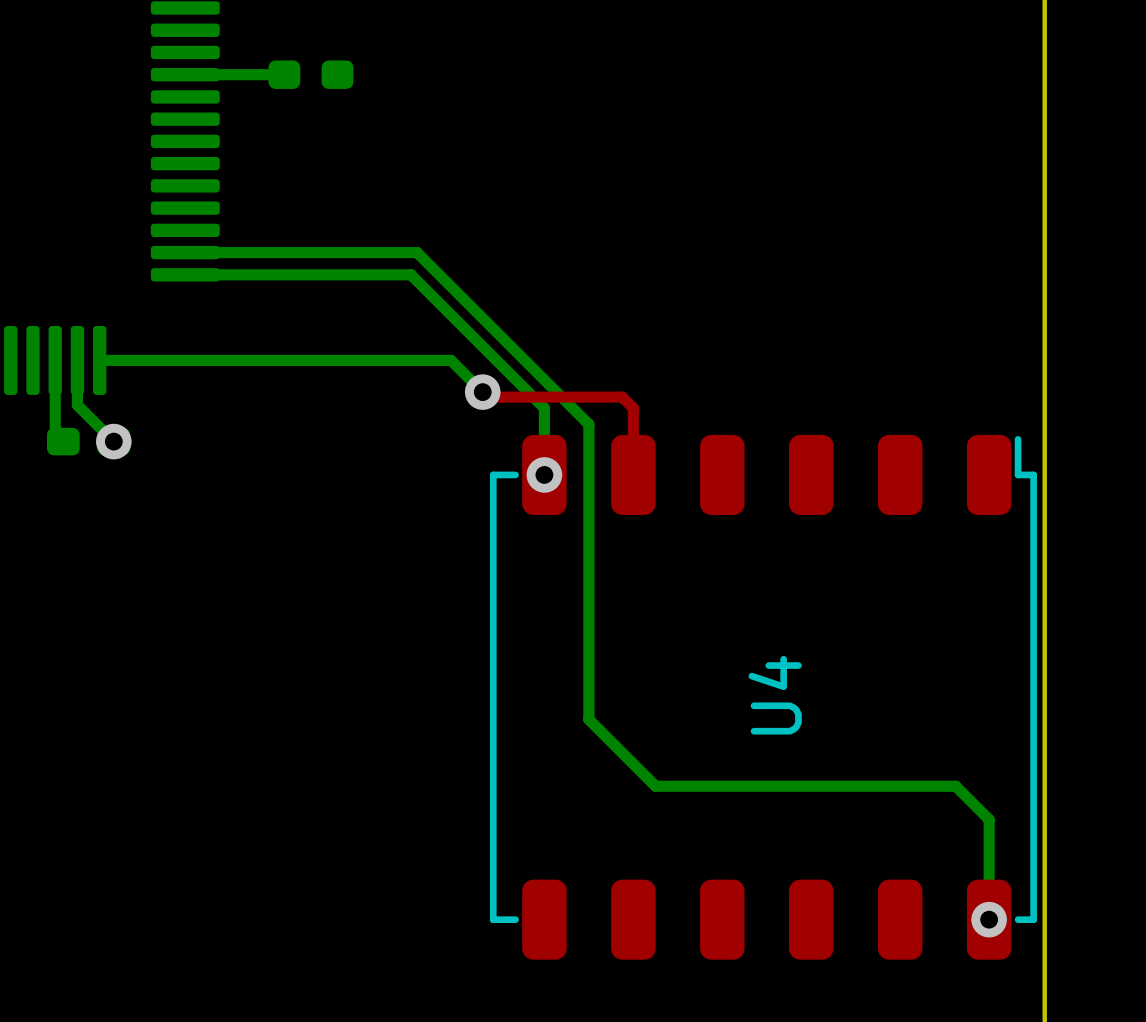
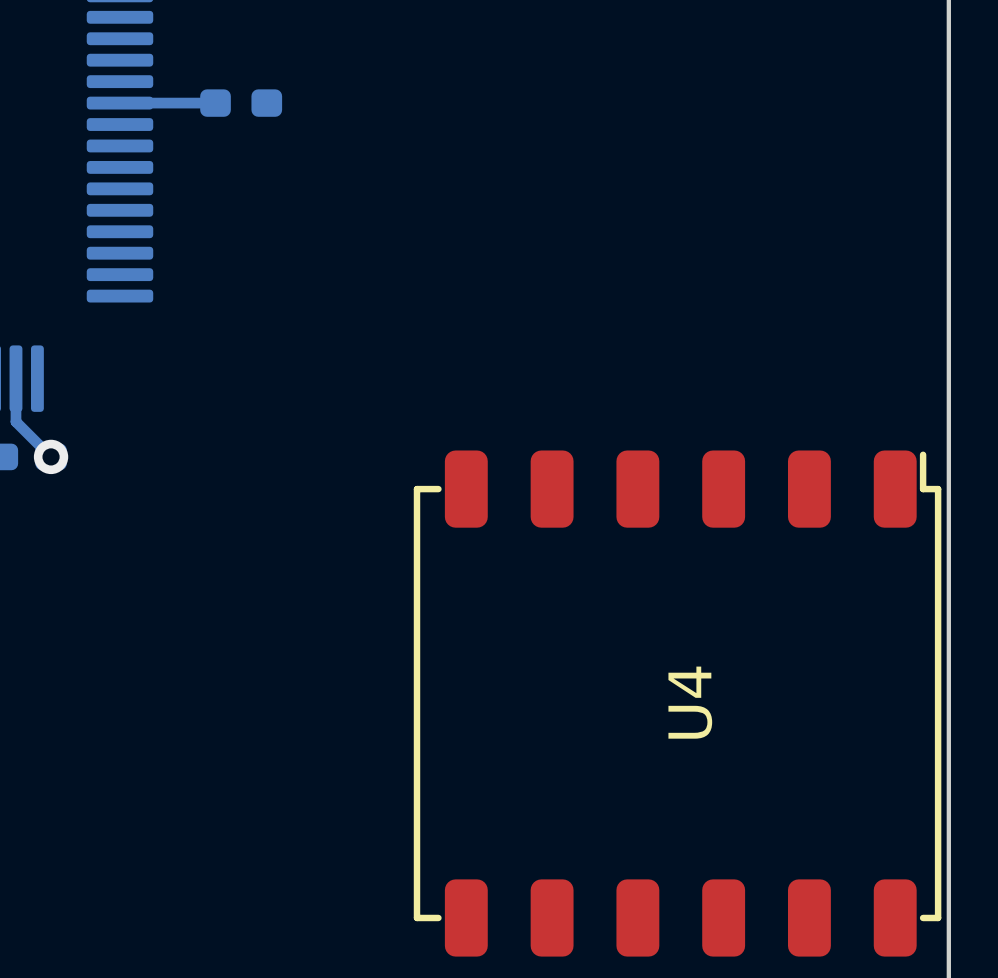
bottom track: (185, 252) (417, 252) (588, 424) (588, 719) (655, 786) (955, 786) (989, 819) (989, 919) -> none
bottom track: (185, 274) (411, 274) (544, 408) (544, 474) -> none
bottom track: (99, 360) (451, 360) (482, 392) -> none
top track: (482, 392) (487, 397) (622, 397) (633, 408) (633, 474) -> none
via: (482, 392) -> none
via: (544, 474) -> none
via: (989, 919) -> none

